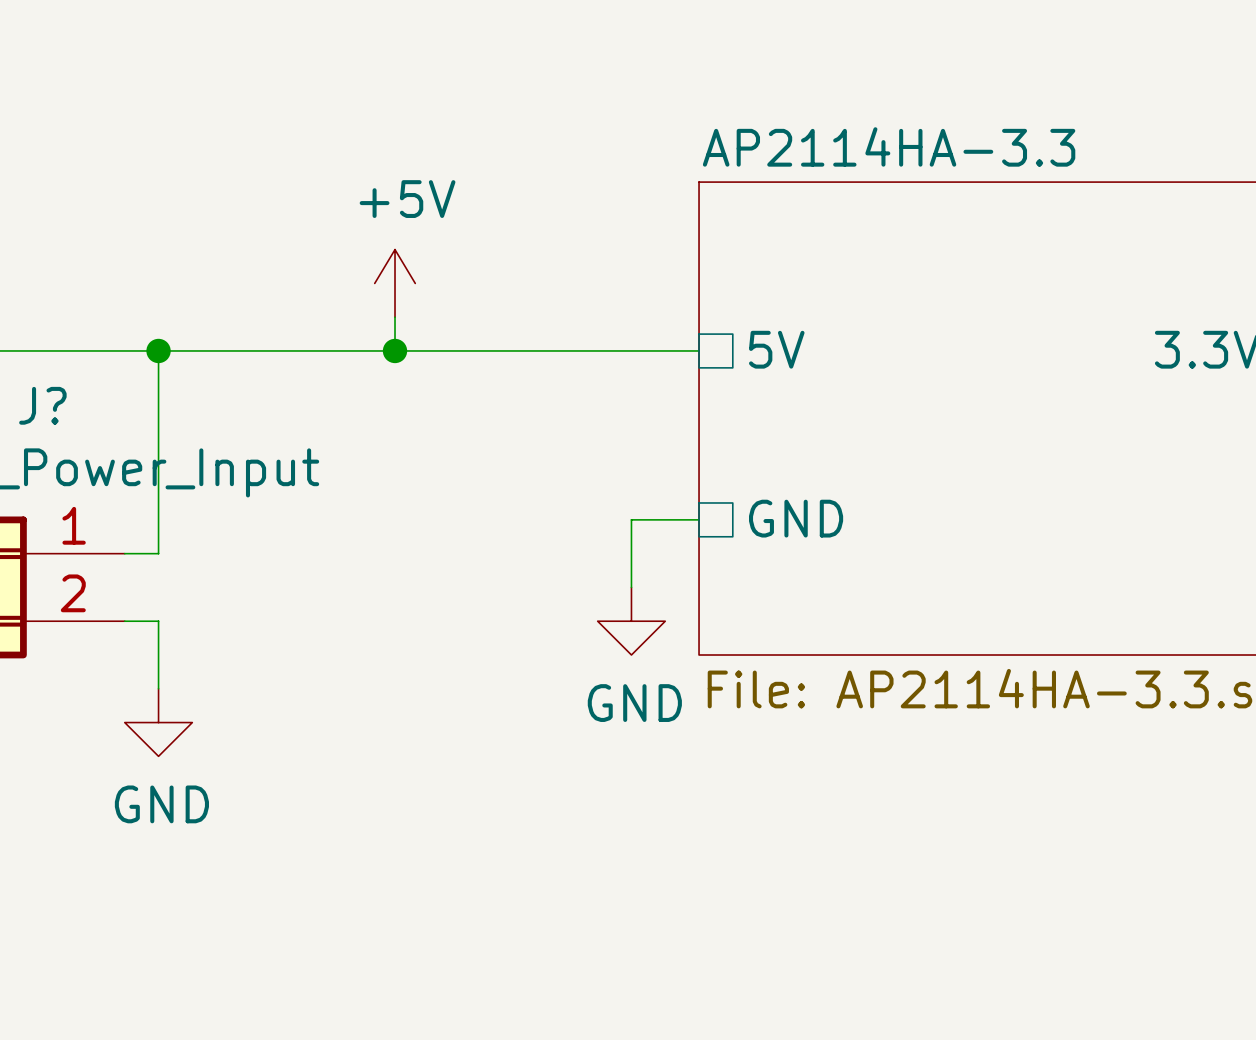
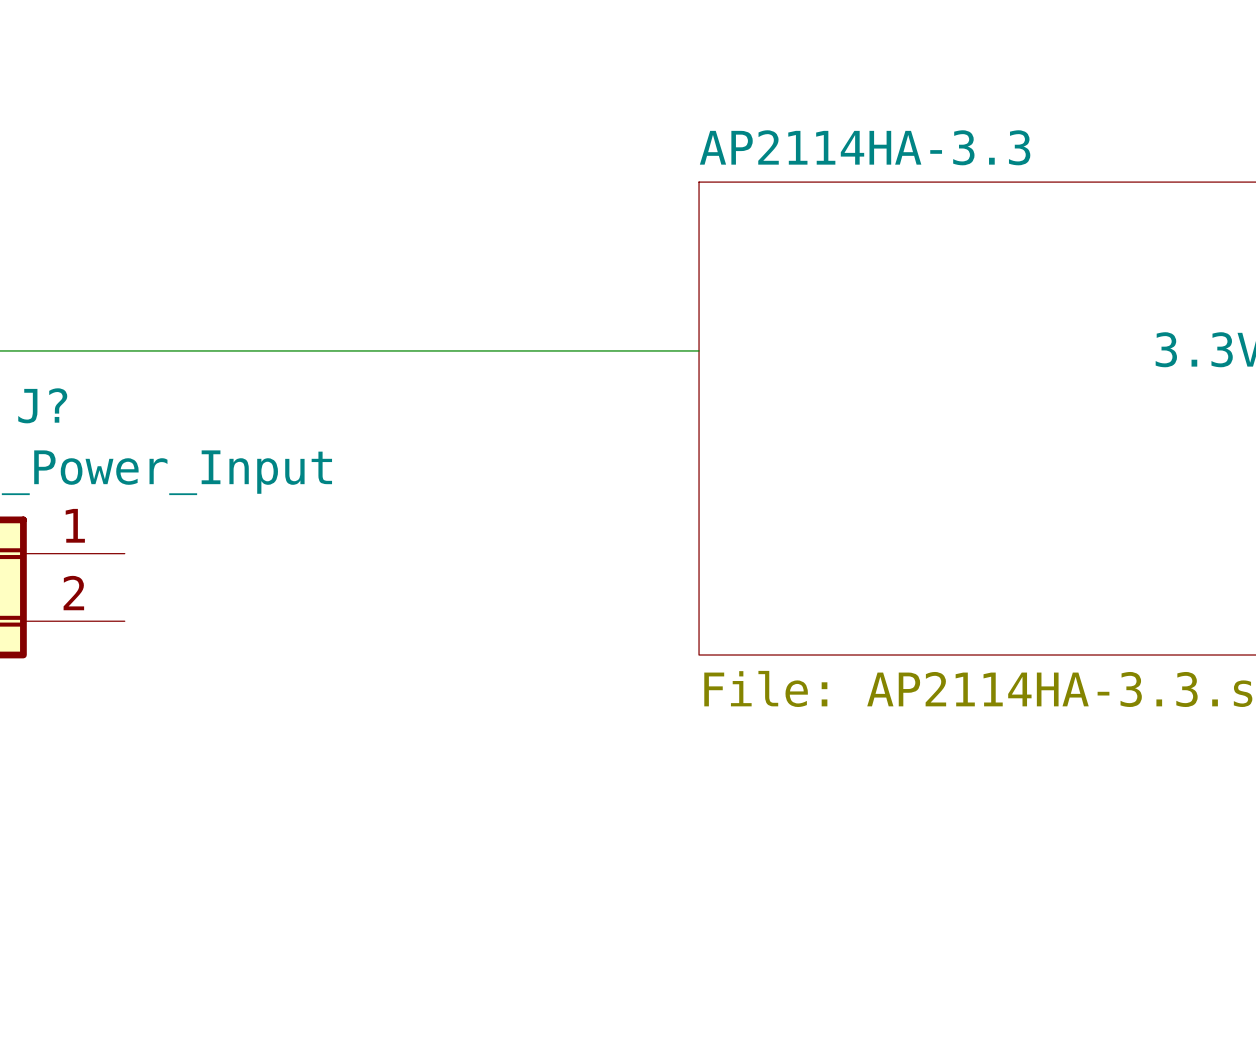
power symbol: +5V (395, 283) -> none
wire: (395, 317) (395, 350) -> none
sheet pin: 5V (776, 349) -> none
wire: (158, 350) (158, 553) (124, 553) -> none
junction: (158, 350) -> none
junction: (395, 350) -> none
sheet pin: GND (796, 518) -> none
wire: (699, 519) (631, 519) (631, 587) -> none
wire: (124, 621) (158, 621) (158, 688) -> none
power symbol: GND (631, 621) -> none
power symbol: GND (158, 722) -> none

